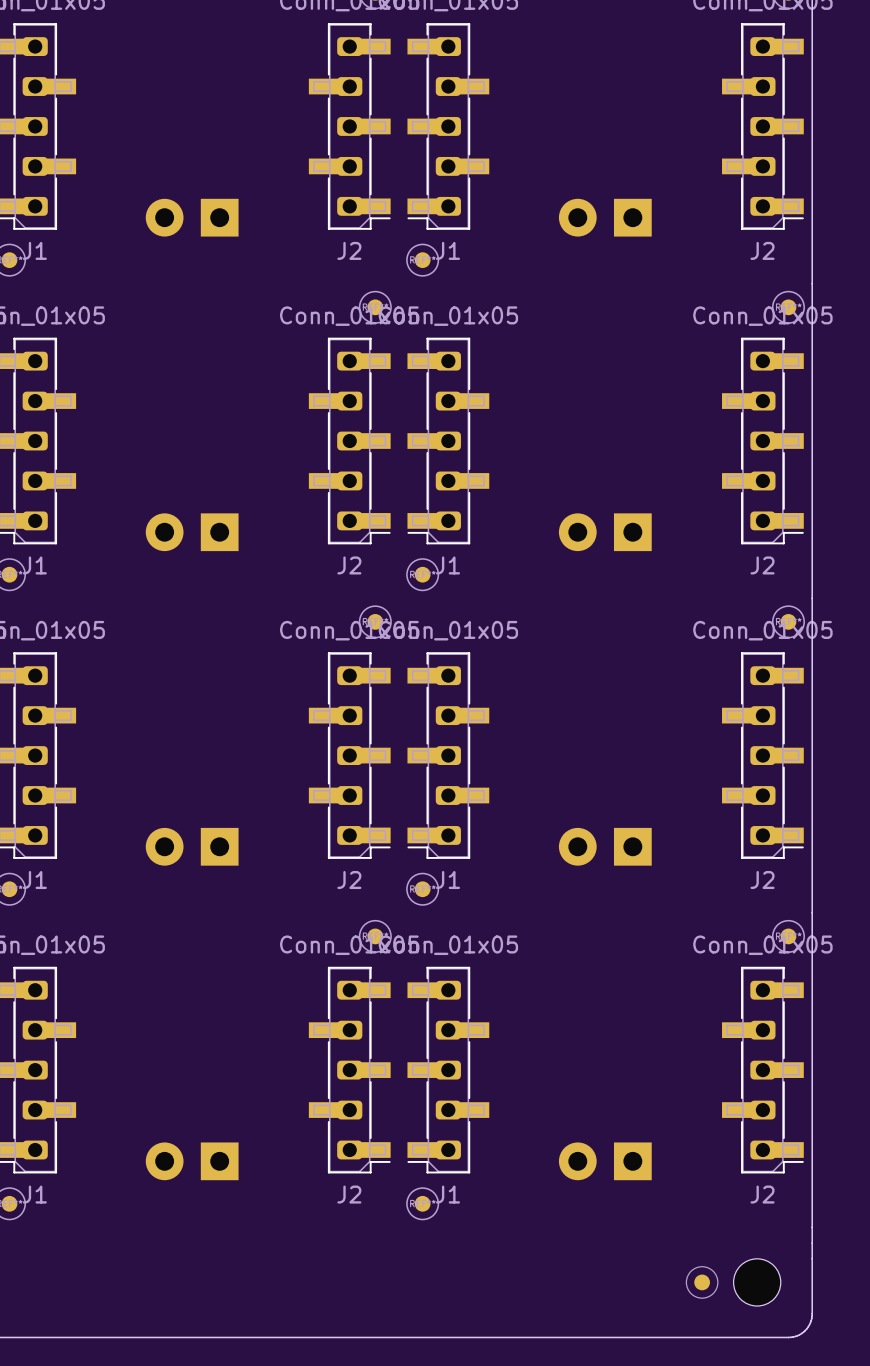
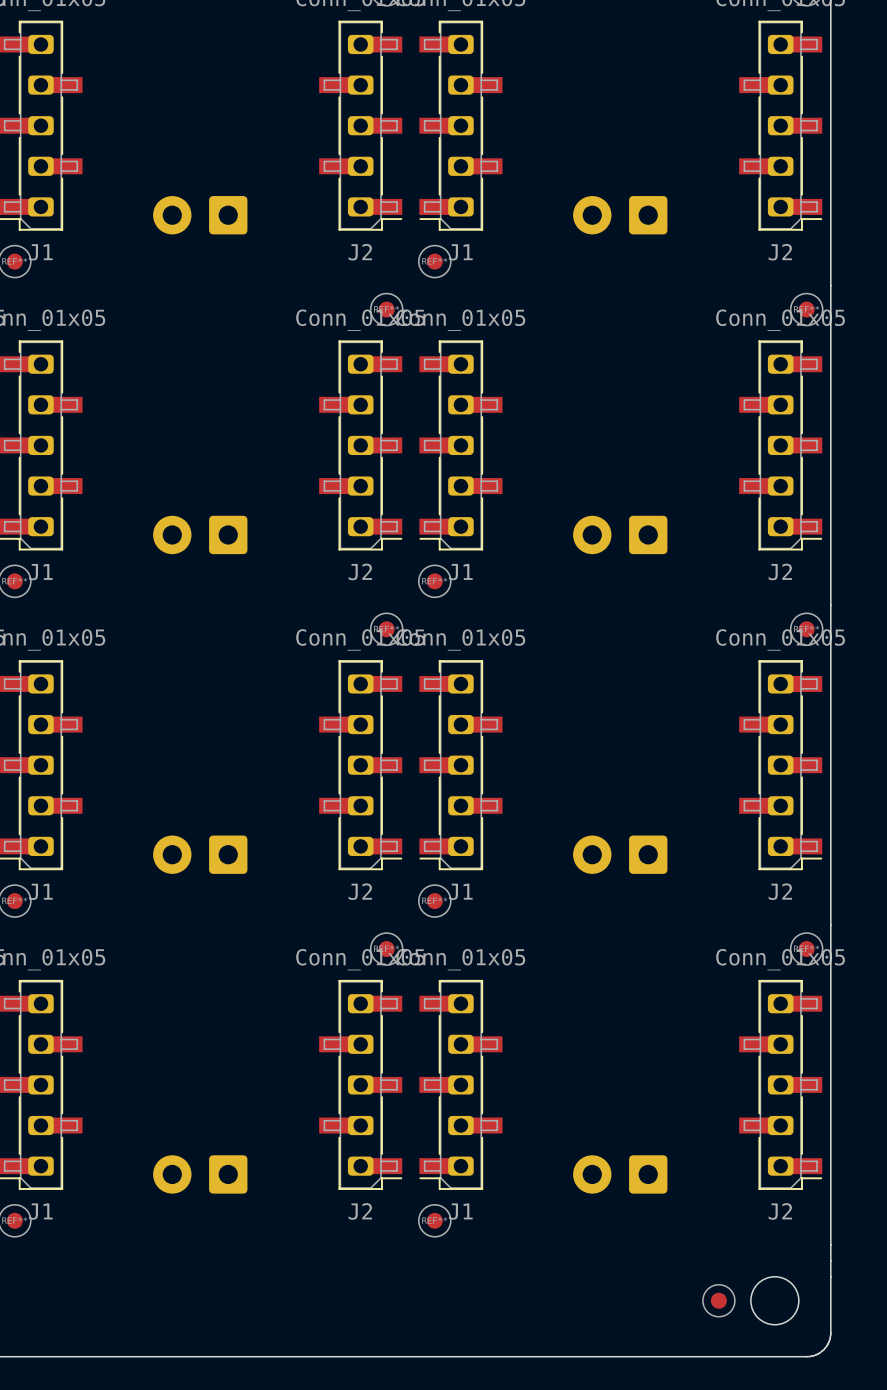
part footprint: [145, 198, 239, 237] -> [153, 196, 248, 235]
part footprint: [558, 198, 652, 237] -> [573, 196, 668, 235]
part footprint: [145, 513, 239, 552] -> [153, 515, 248, 555]
part footprint: [558, 513, 652, 552] -> [573, 515, 668, 555]
part footprint: [145, 827, 239, 866] -> [153, 835, 248, 874]
part footprint: [558, 827, 652, 866] -> [573, 835, 668, 874]
part footprint: [145, 1142, 239, 1181] -> [153, 1155, 248, 1194]
part footprint: [558, 1142, 652, 1181] -> [573, 1155, 668, 1194]

